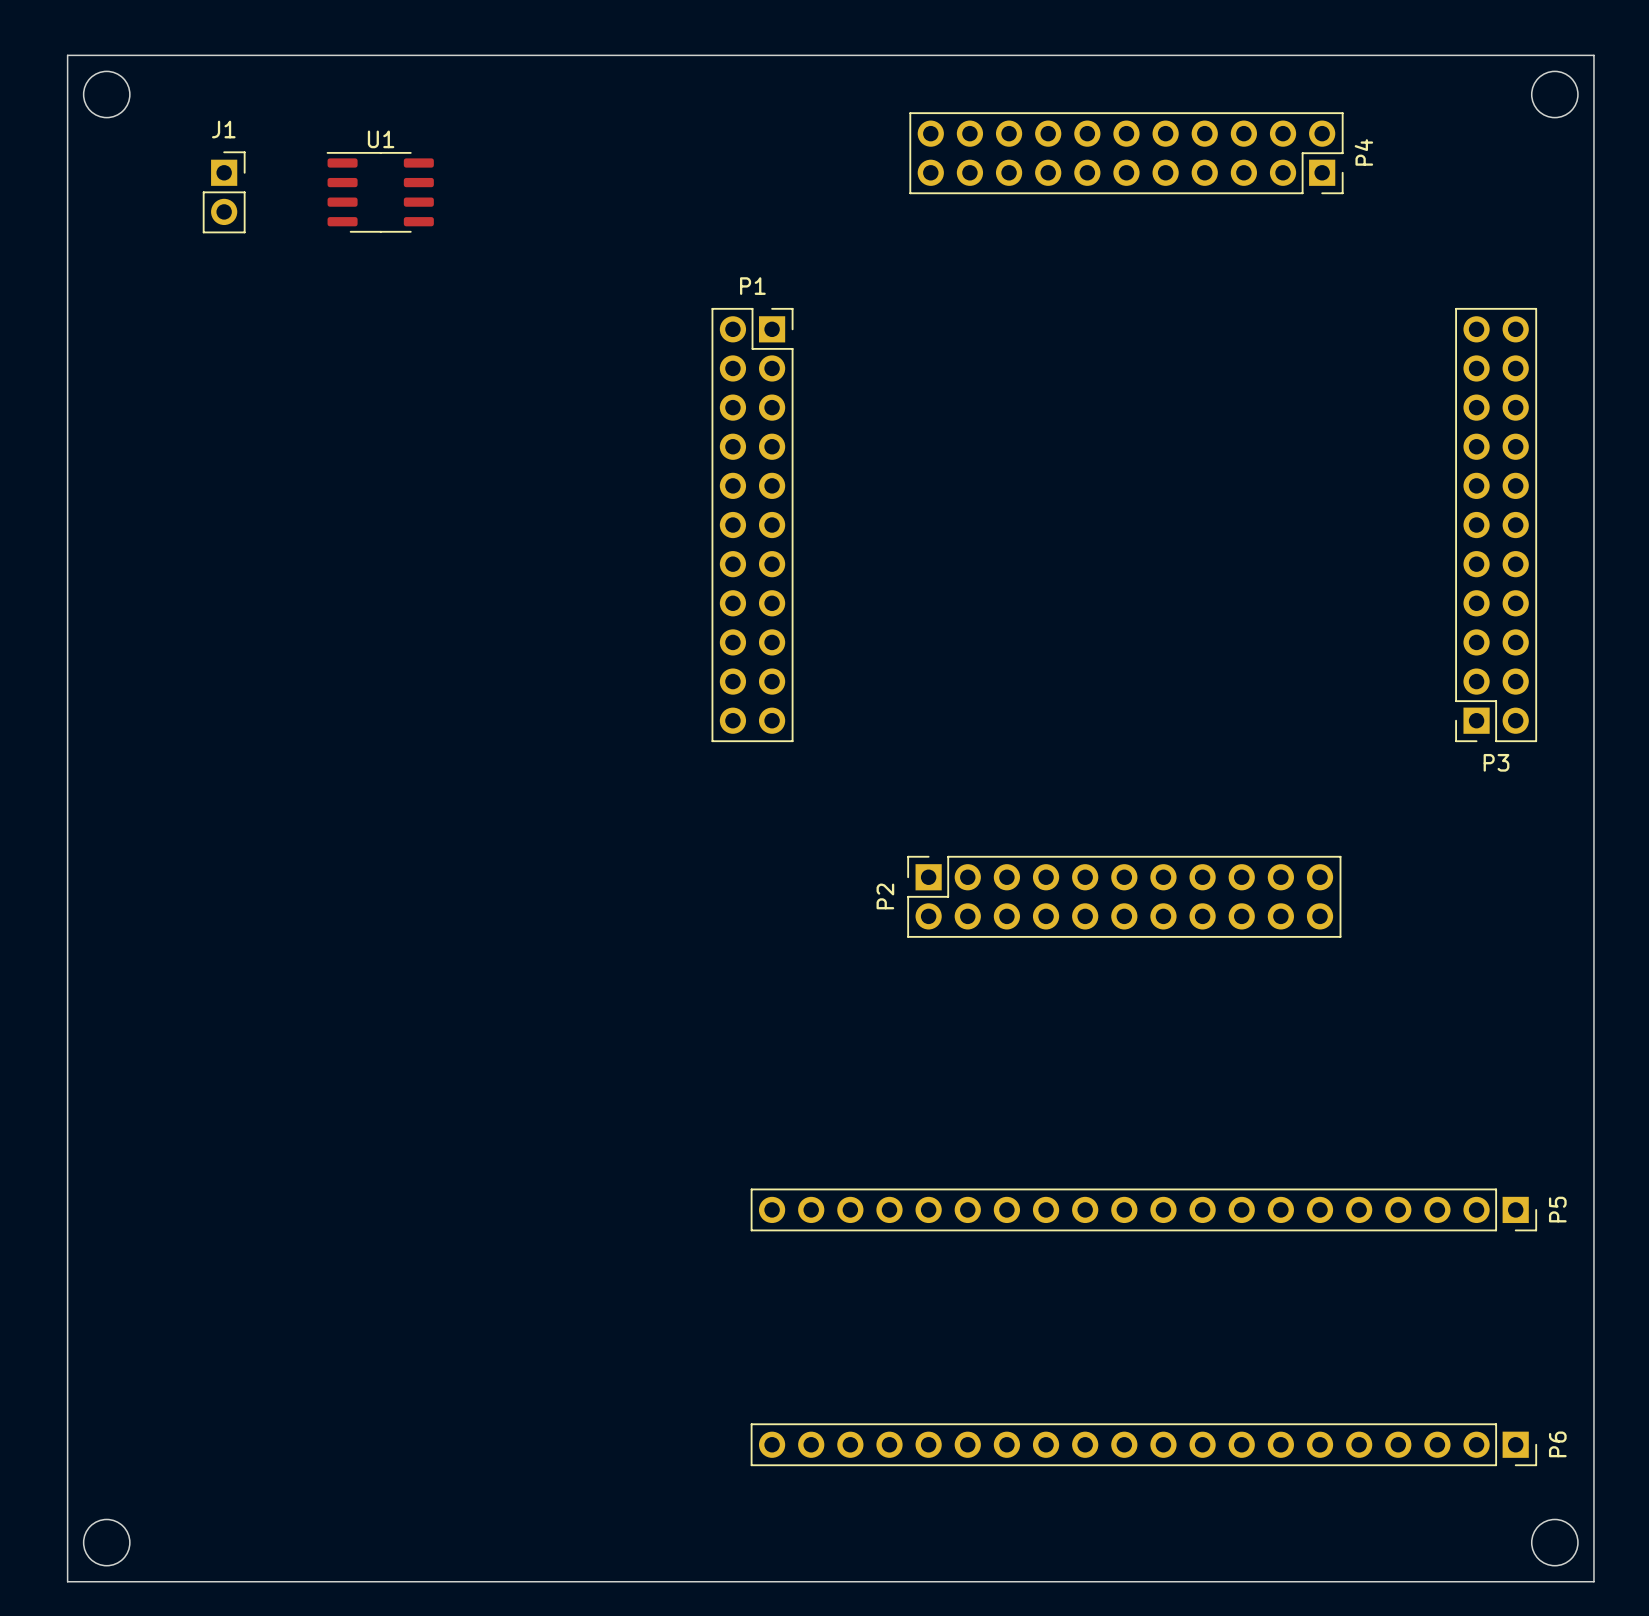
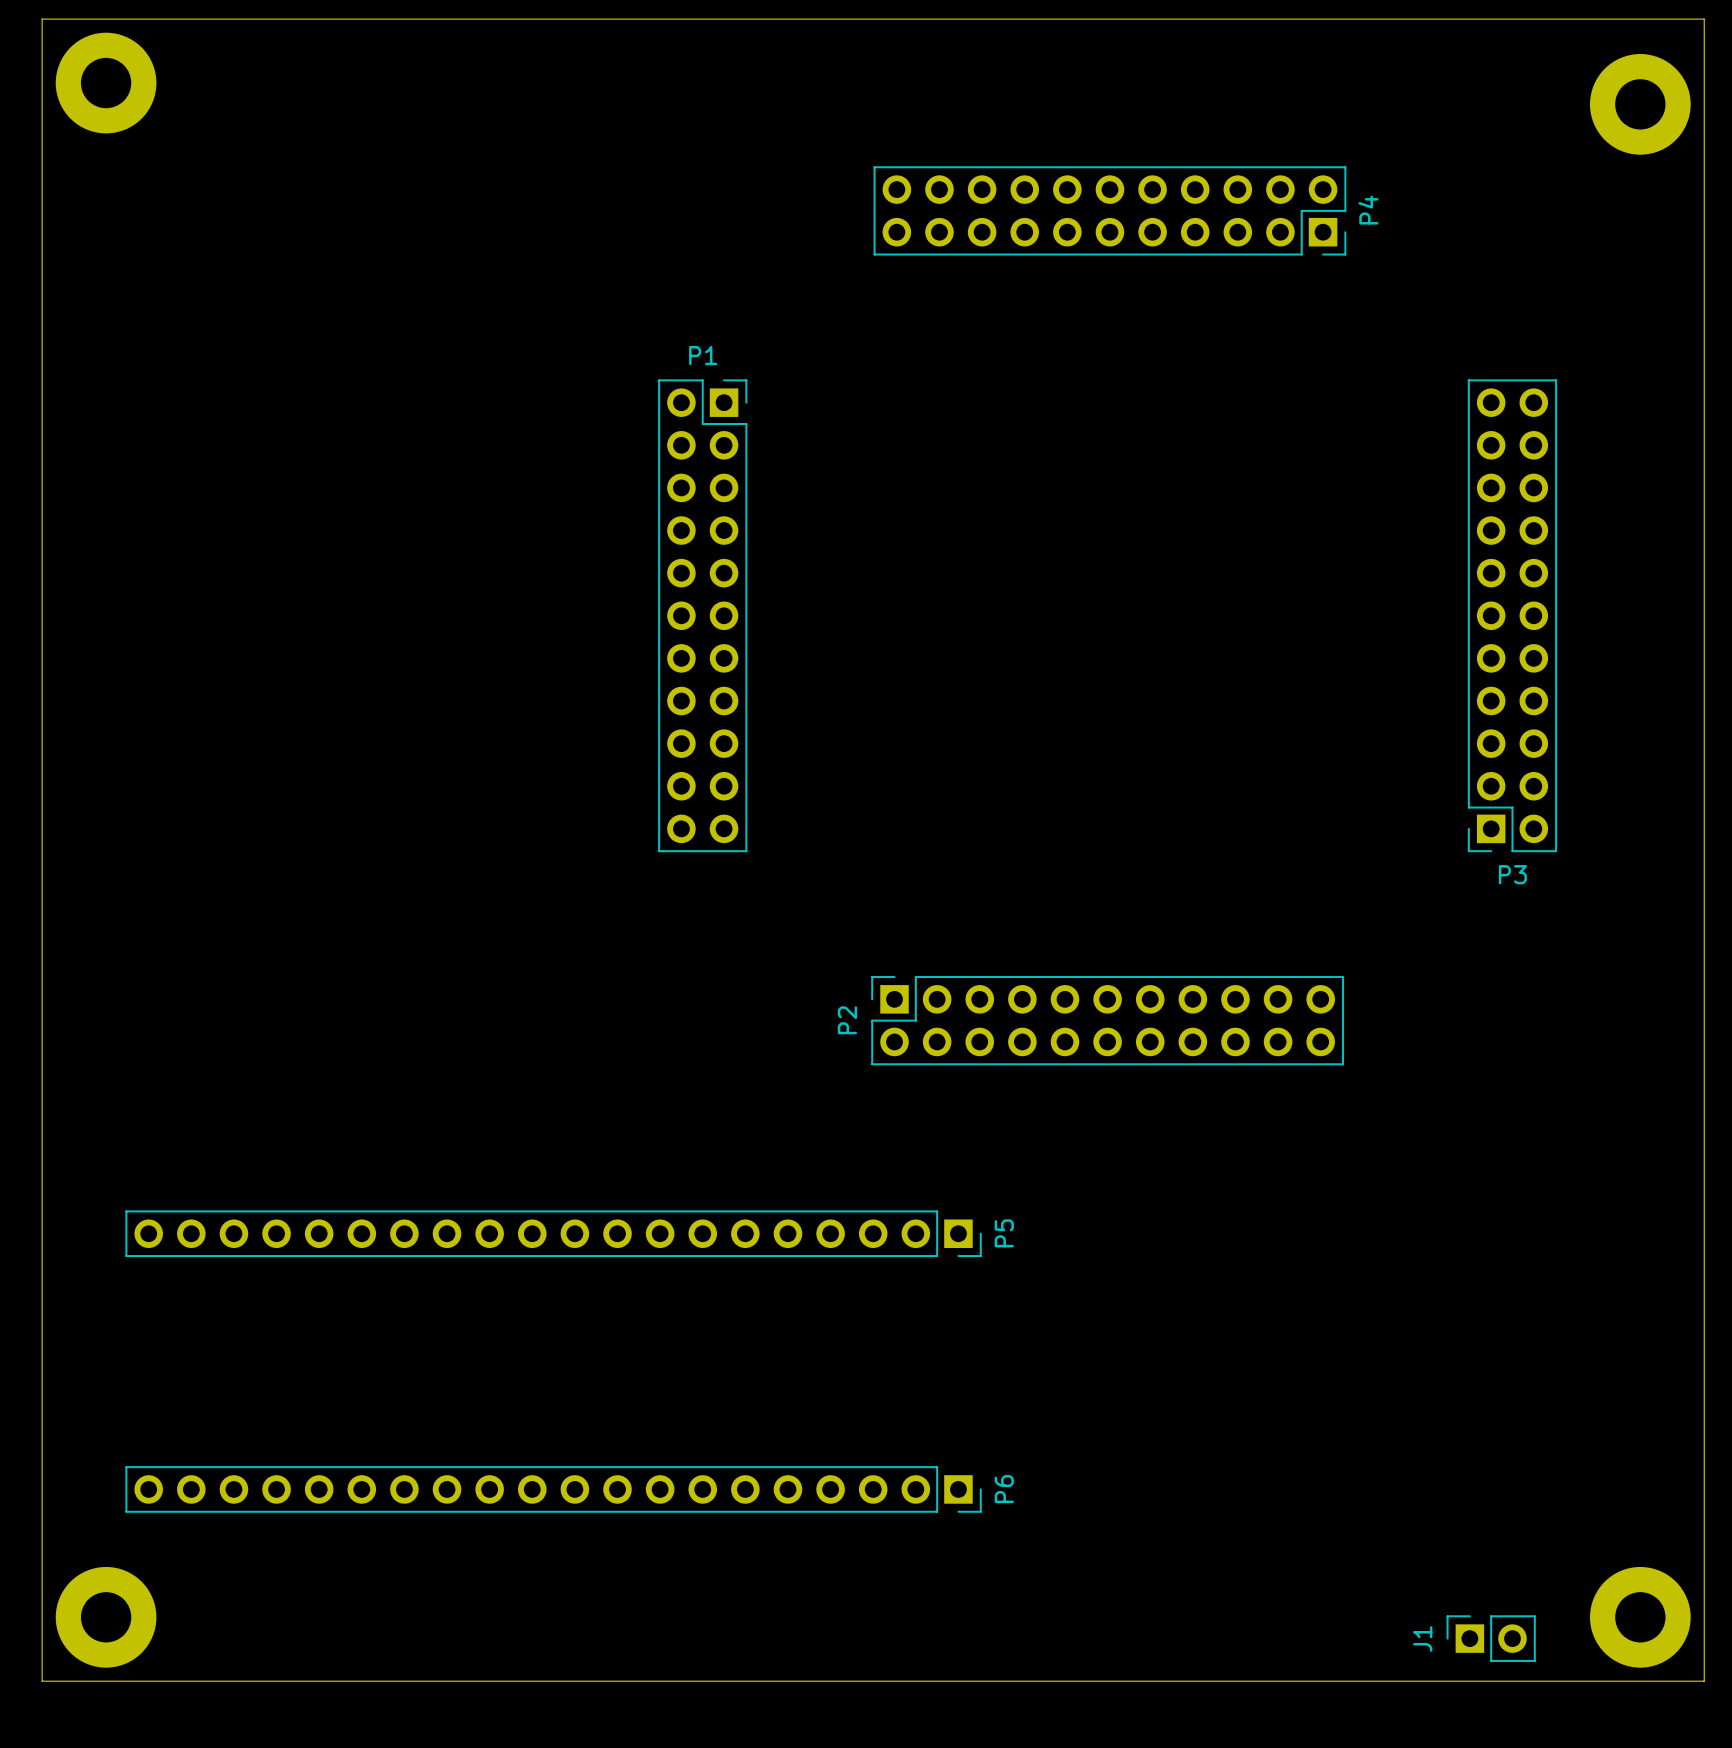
round board edge: [82, 70, 131, 119] -> none
round board edge: [1530, 70, 1579, 119] -> none
part: none -> (106, 83)
part: none -> (1640, 104)
P4 position: (1126, 153) -> (1109, 210)
J1 rotation: 0° (224, 192) -> 90° counterclockwise (1491, 1638)
J1 position: (224, 192) -> (1491, 1638)
U1: (380, 192) -> none
P1 position: (752, 525) -> (702, 615)
P3 position: (1496, 525) -> (1512, 615)
P2 position: (1124, 896) -> (1107, 1020)
P5 position: (1143, 1209) -> (553, 1233)
P6 position: (1143, 1444) -> (553, 1489)
round board edge: [82, 1518, 131, 1567] -> none
round board edge: [1530, 1518, 1579, 1567] -> none
part: none -> (106, 1617)
part: none -> (1640, 1617)

